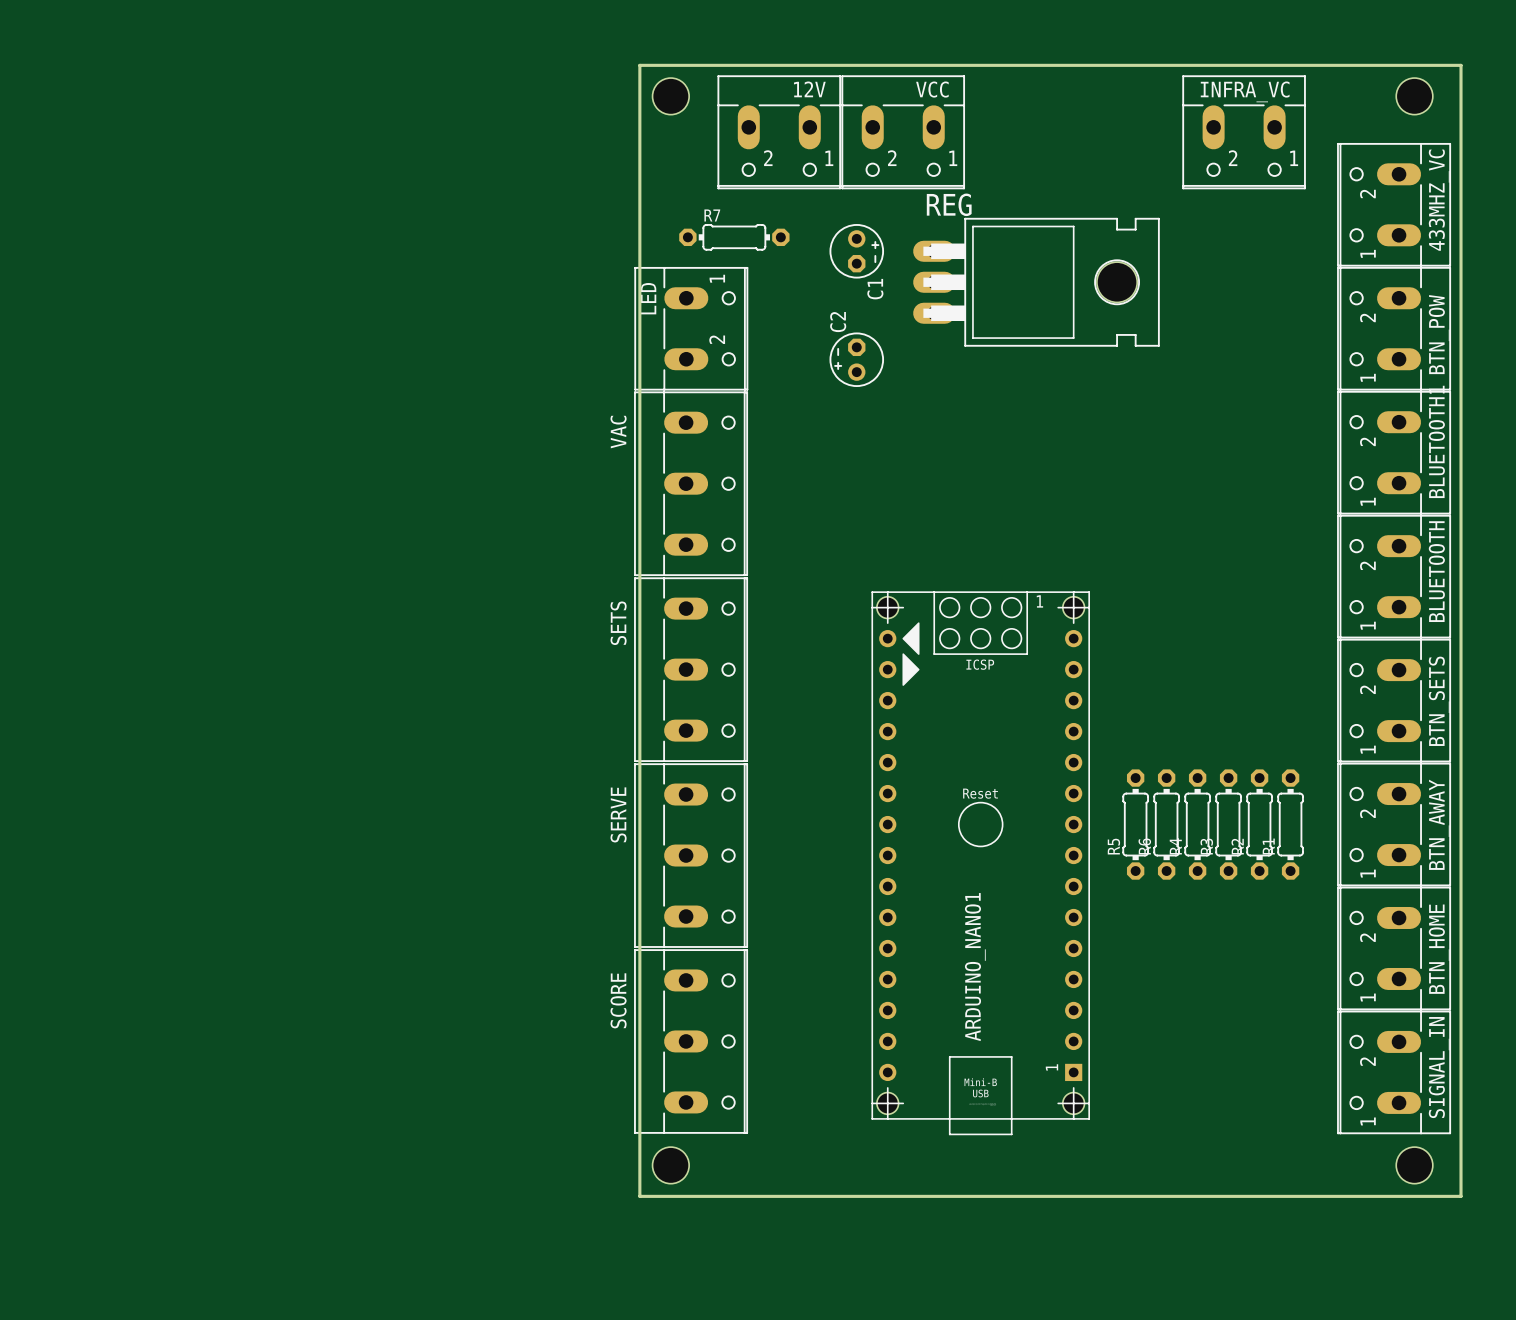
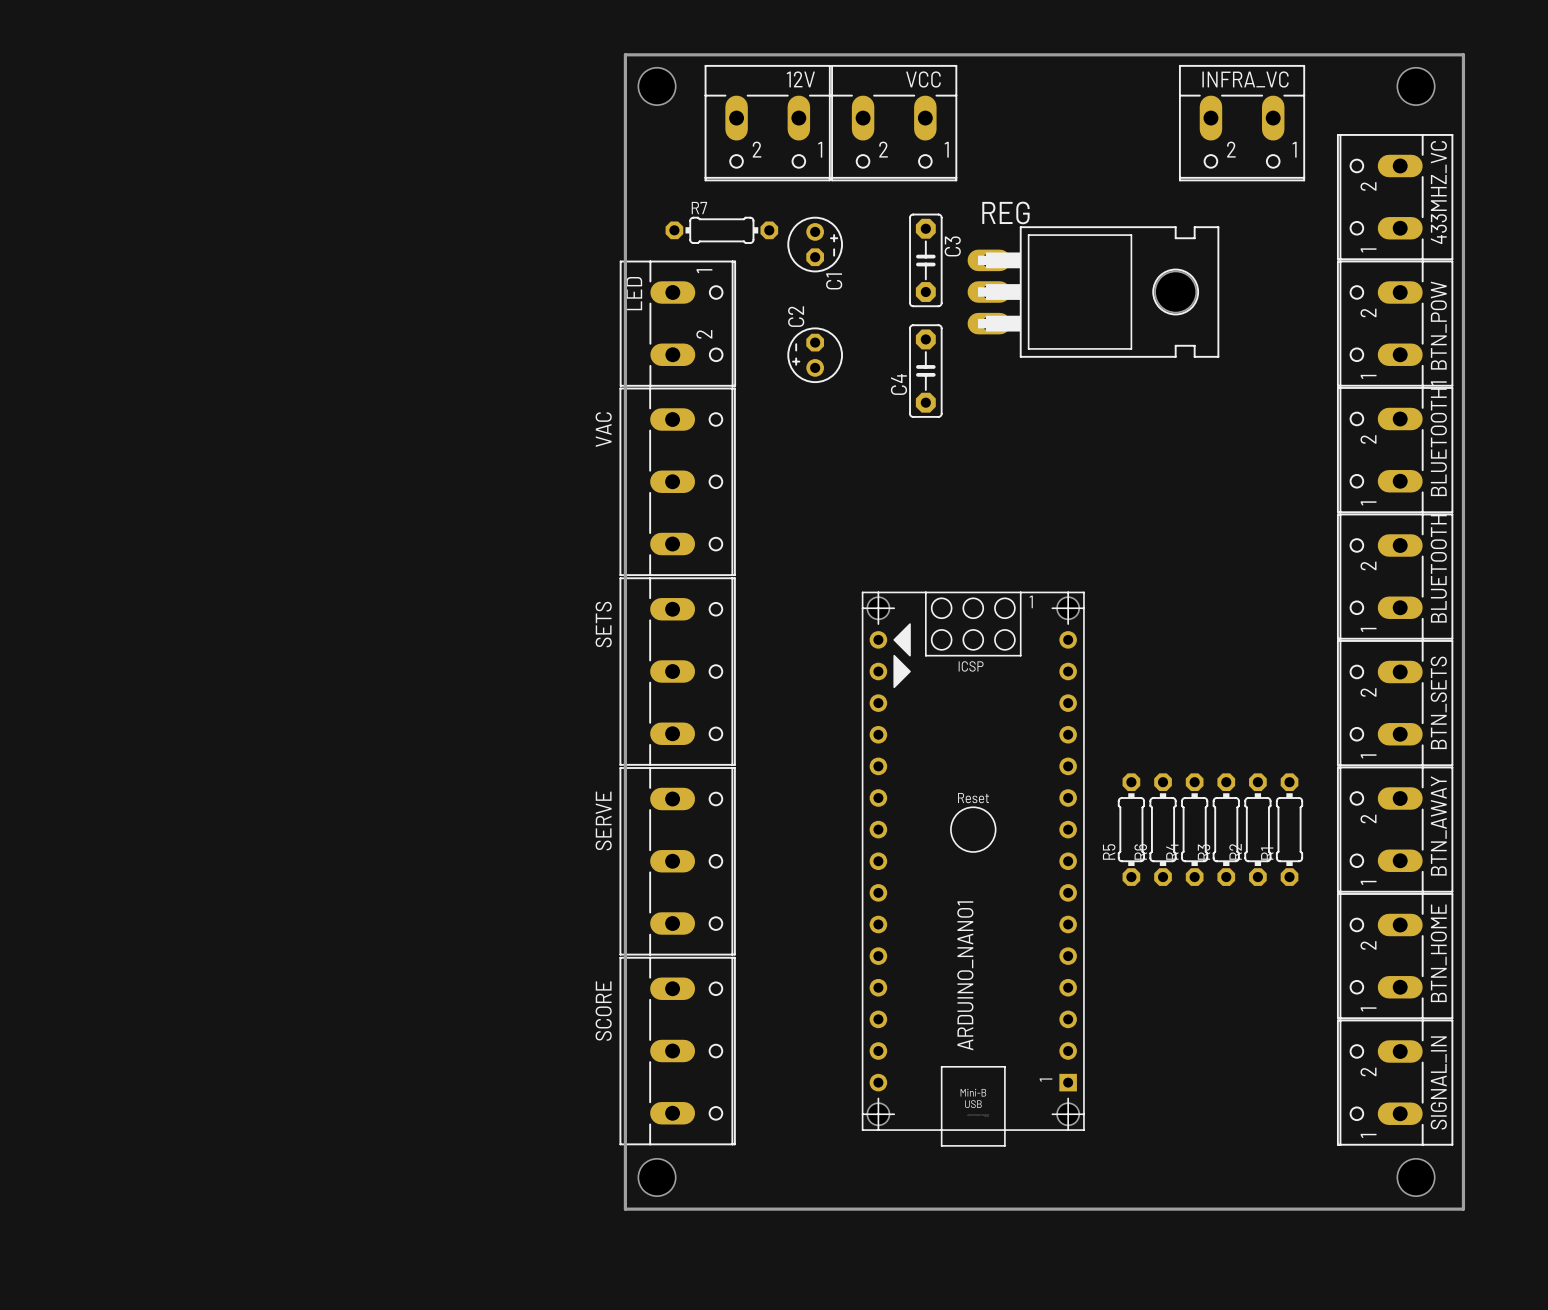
C1 position: (856, 251) -> (815, 244)
C3: none -> (925, 260)
REG position: (1036, 282) -> (1093, 292)
C2 position: (856, 359) -> (815, 355)
C4: none -> (925, 371)

